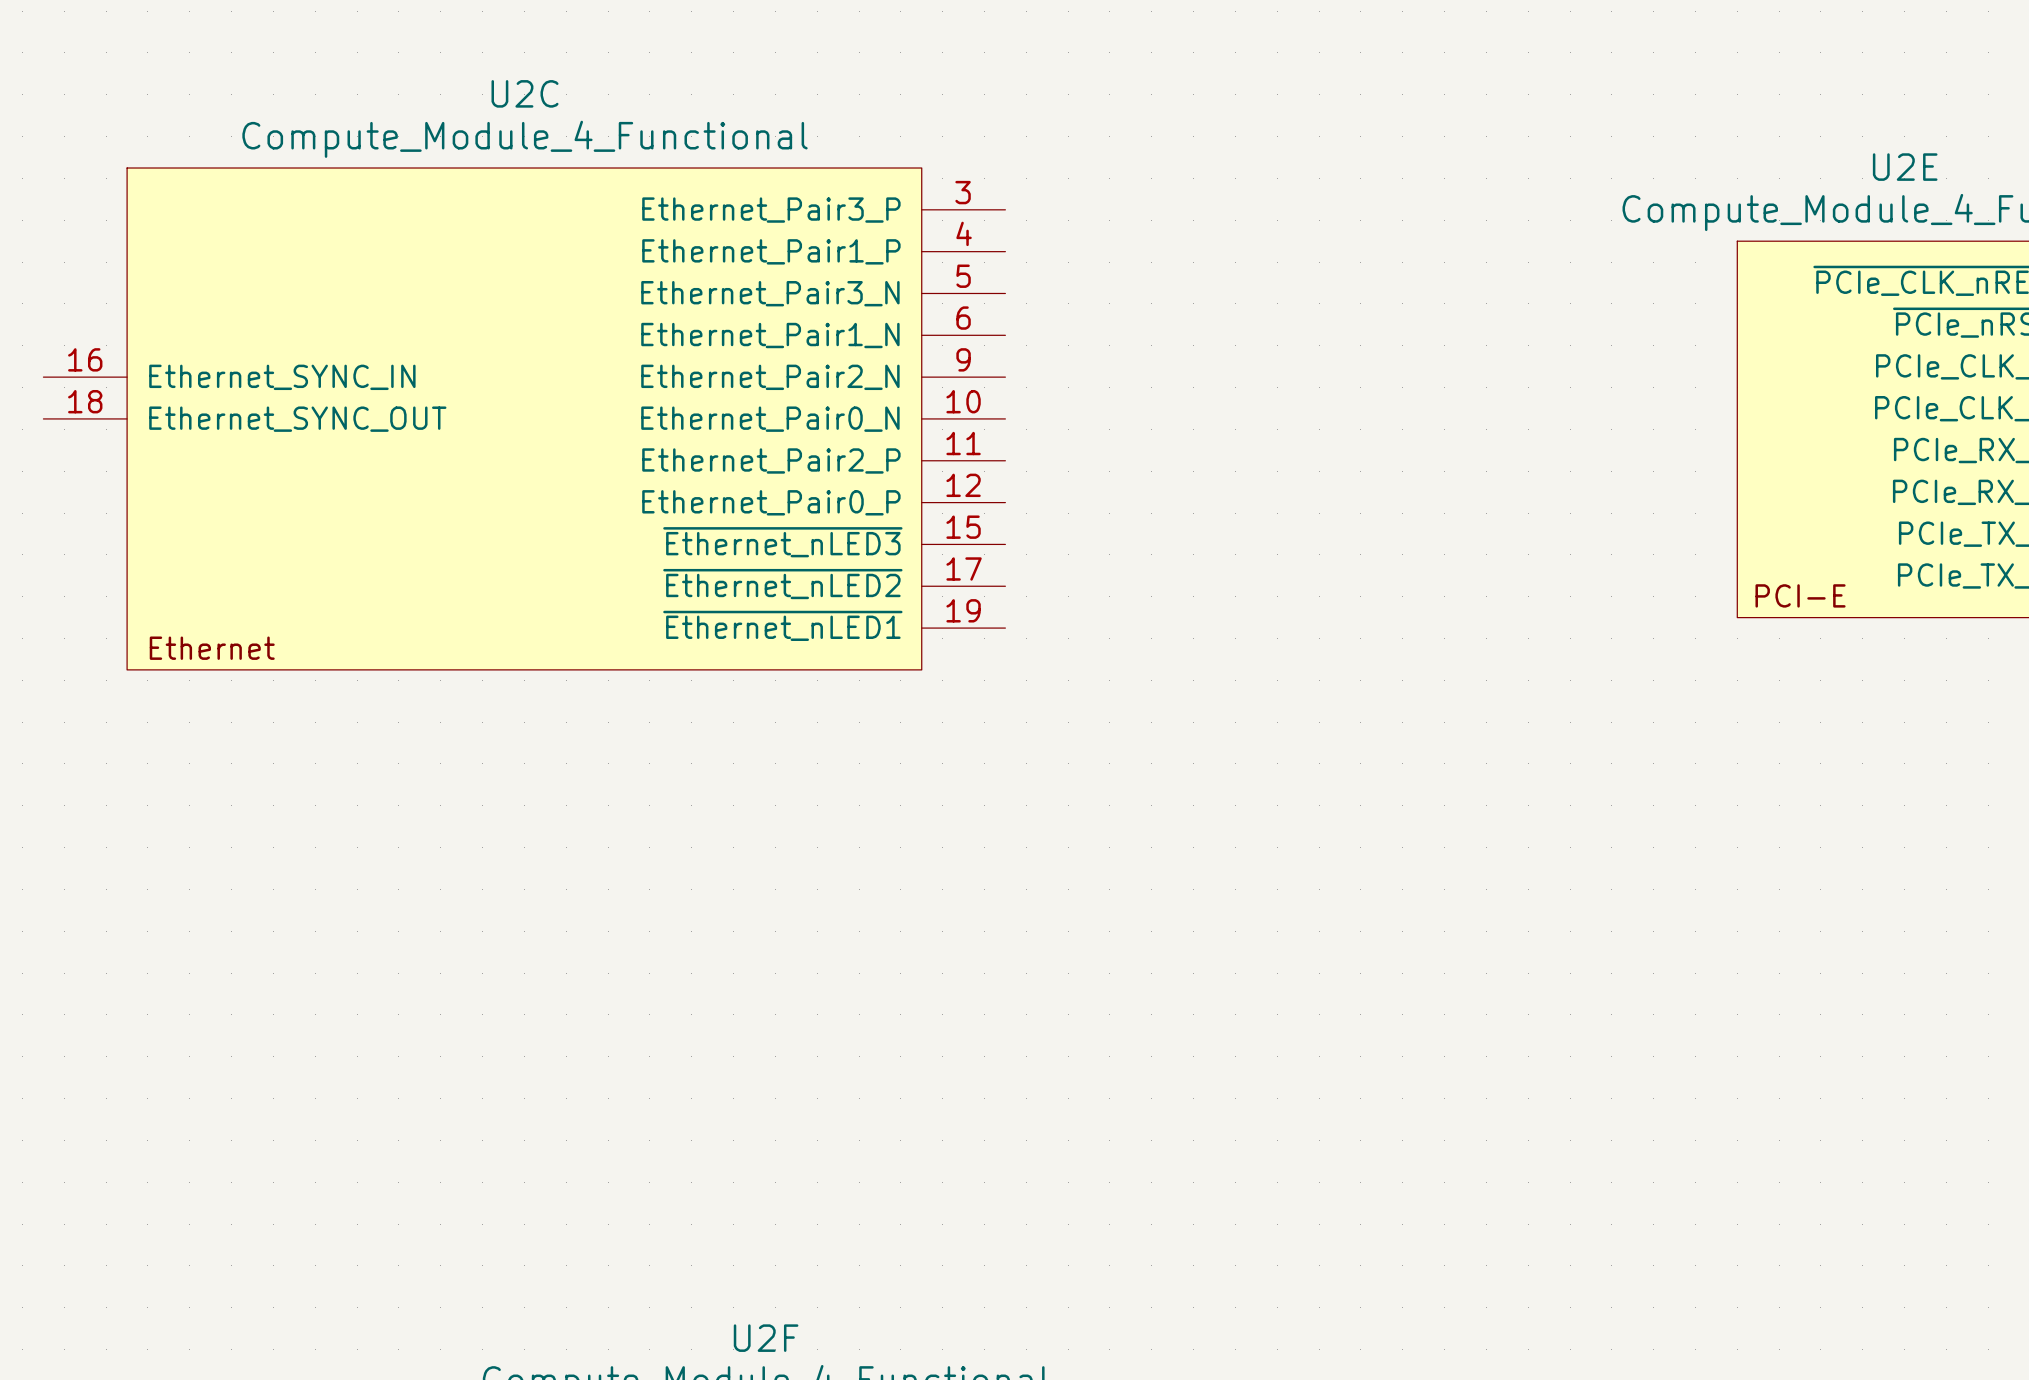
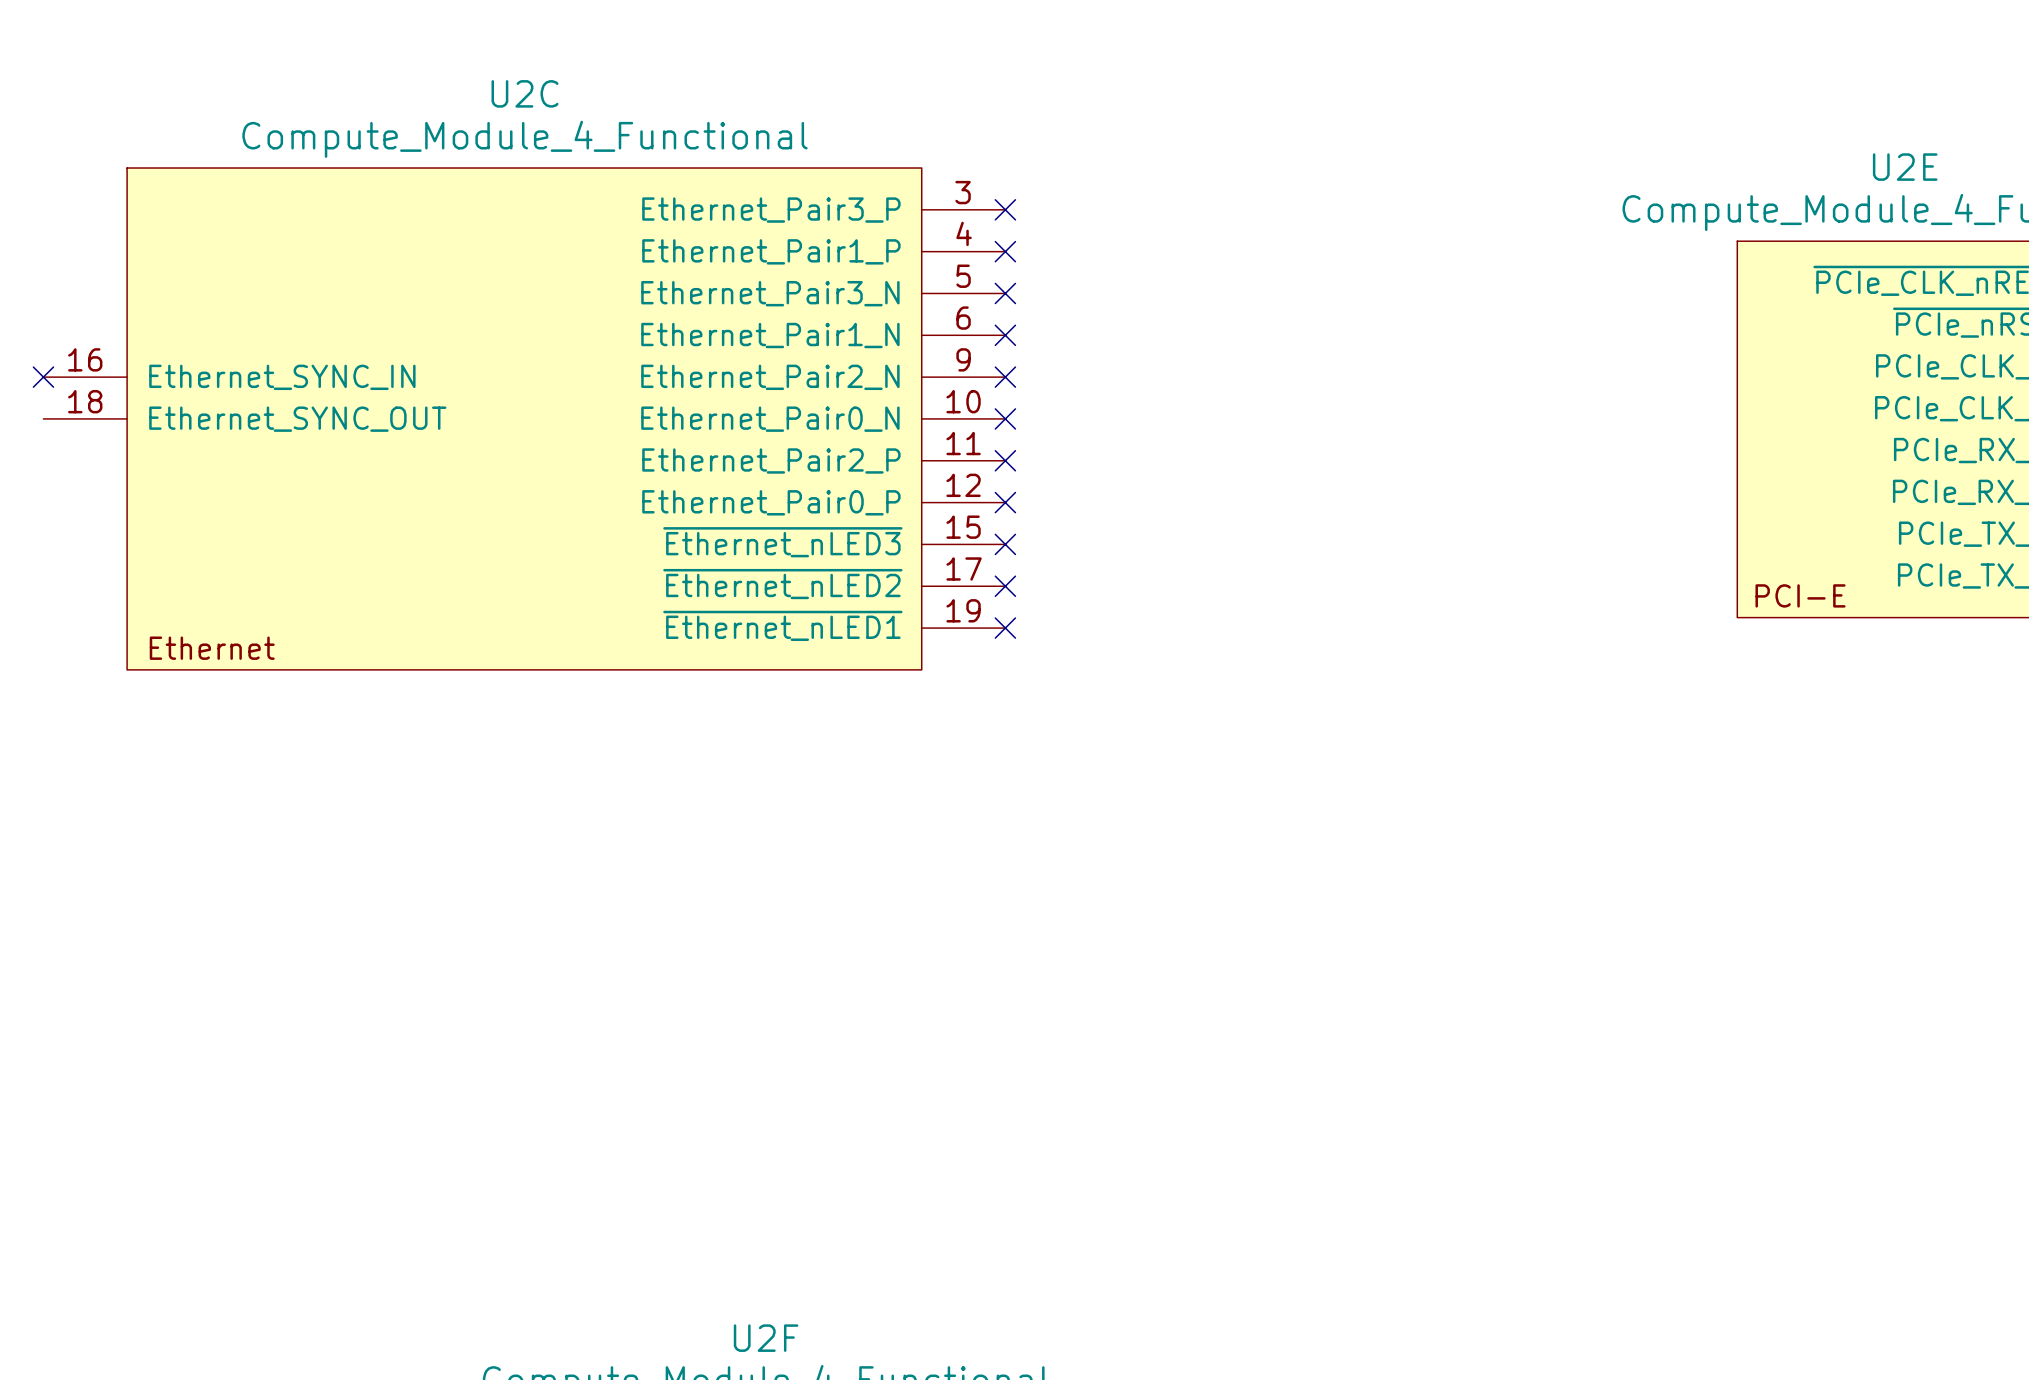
no-connect mark: none -> (1005, 209)
no-connect mark: none -> (1005, 251)
no-connect mark: none -> (1005, 293)
no-connect mark: none -> (1005, 335)
no-connect mark: none -> (43, 377)
no-connect mark: none -> (1005, 377)
no-connect mark: none -> (1005, 418)
no-connect mark: none -> (1005, 460)
no-connect mark: none -> (1005, 502)
no-connect mark: none -> (1005, 544)
no-connect mark: none -> (1005, 586)
no-connect mark: none -> (1005, 628)

